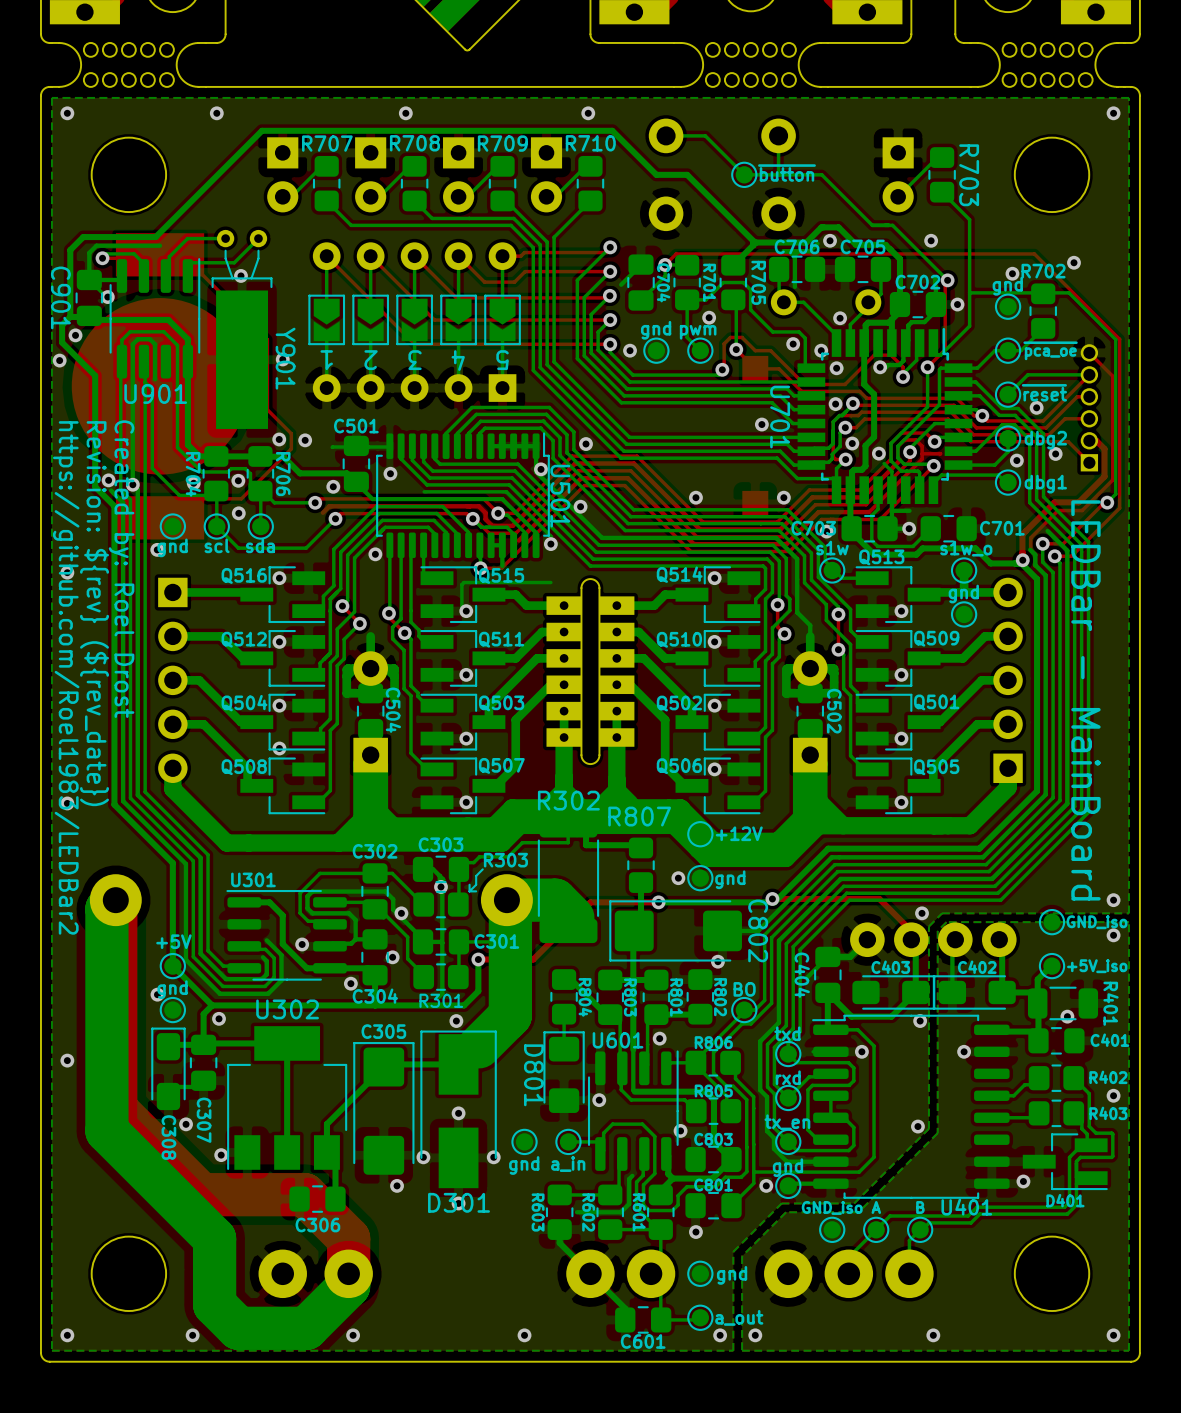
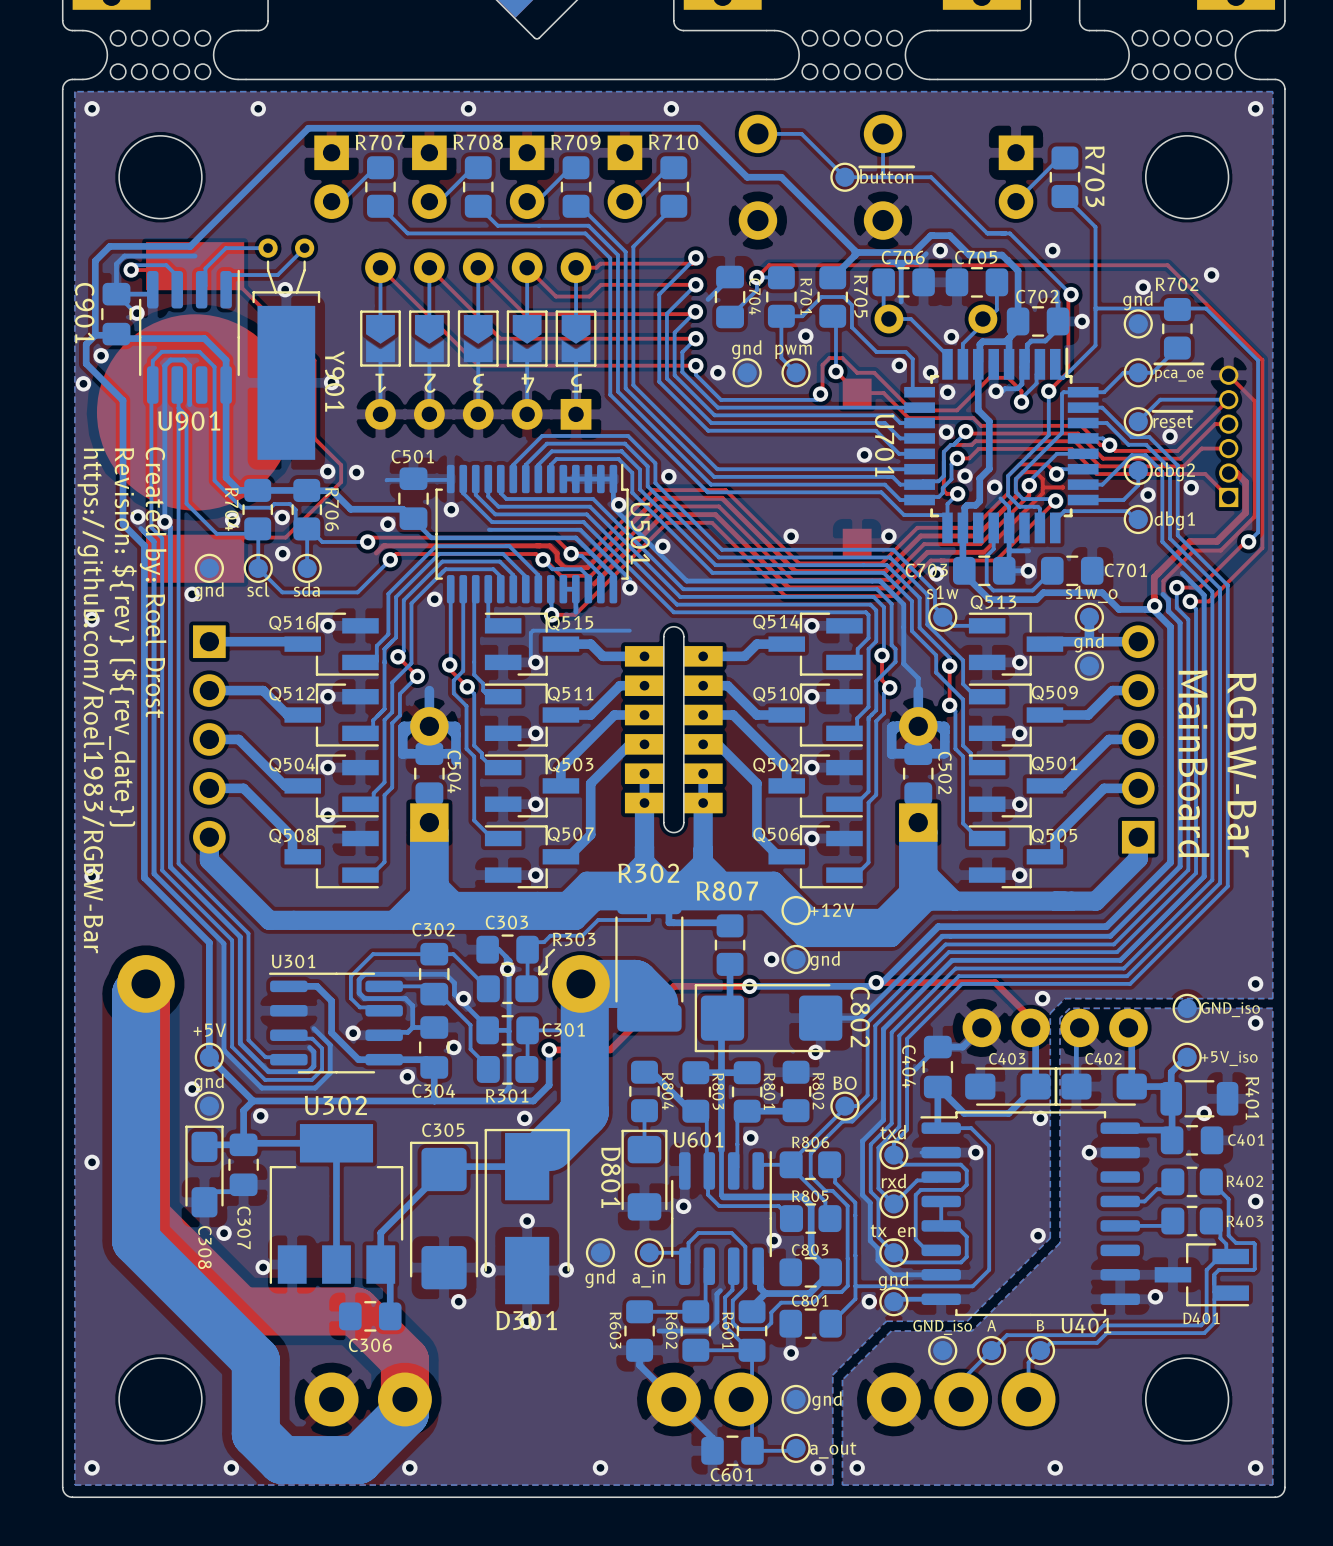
text: https://github.com/Roel1983/LEDBar2 (66, 677) -> https://github.com/Roel1983/RGBW-Bar (90, 700)
text: LEDBar - MainBoard (1085, 700) -> MainBoard (1193, 763)
text: none -> RGBW-Bar (1241, 765)

